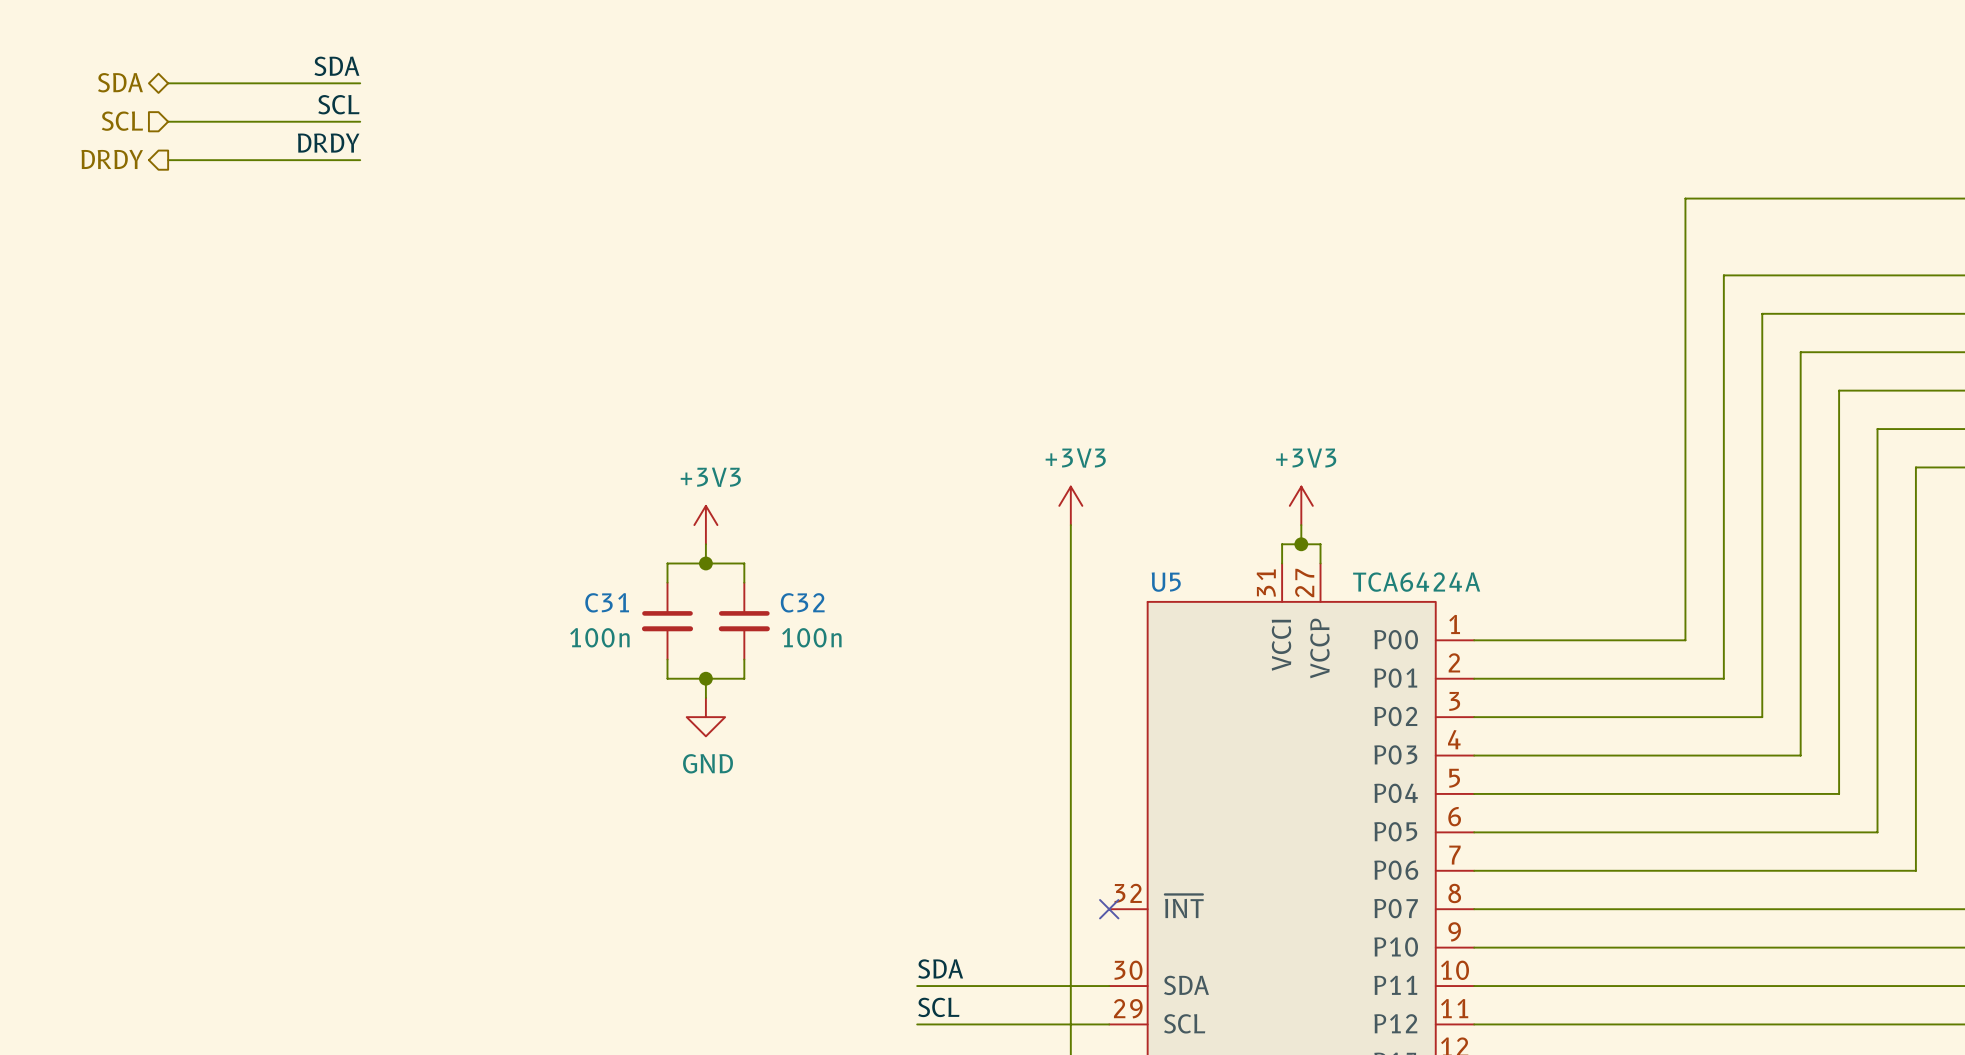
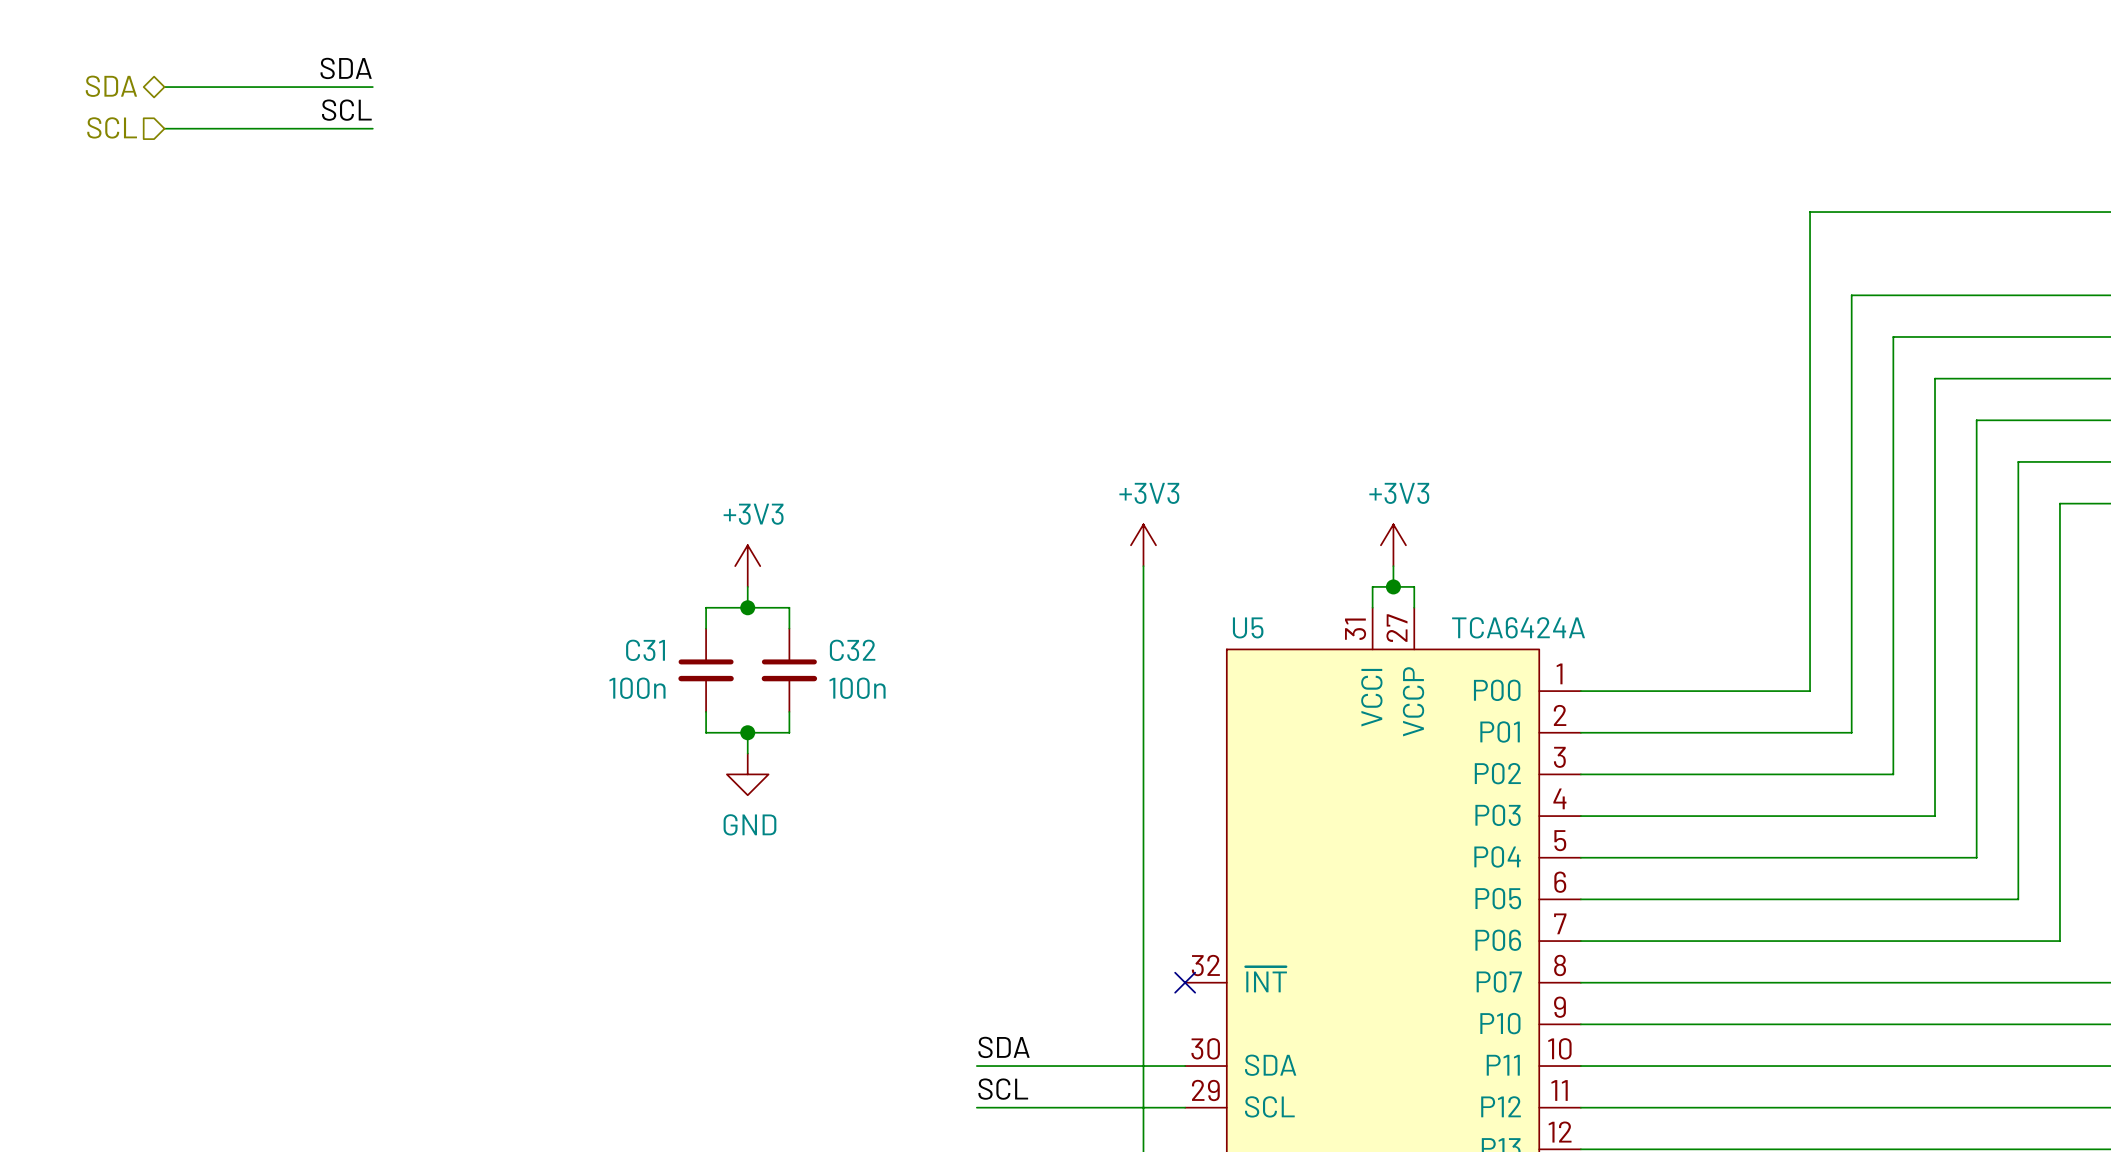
label: DRDY (328, 143) -> none
hierarchical label: DRDY (112, 159) -> none
wire: (168, 160) (360, 160) -> none

